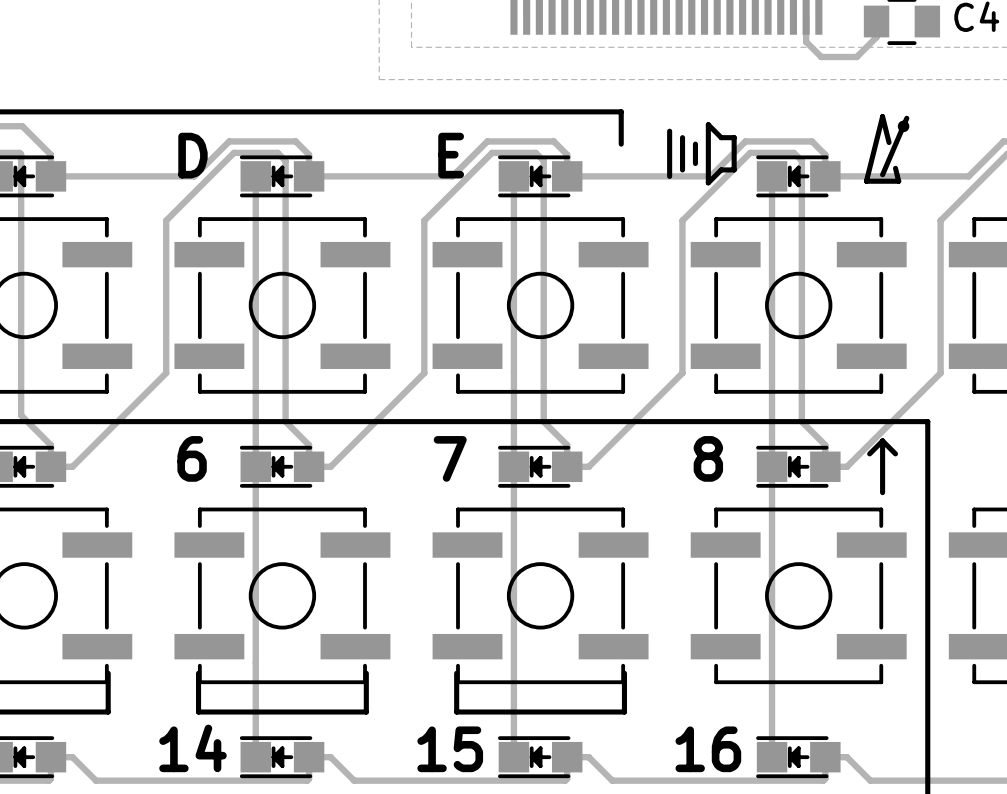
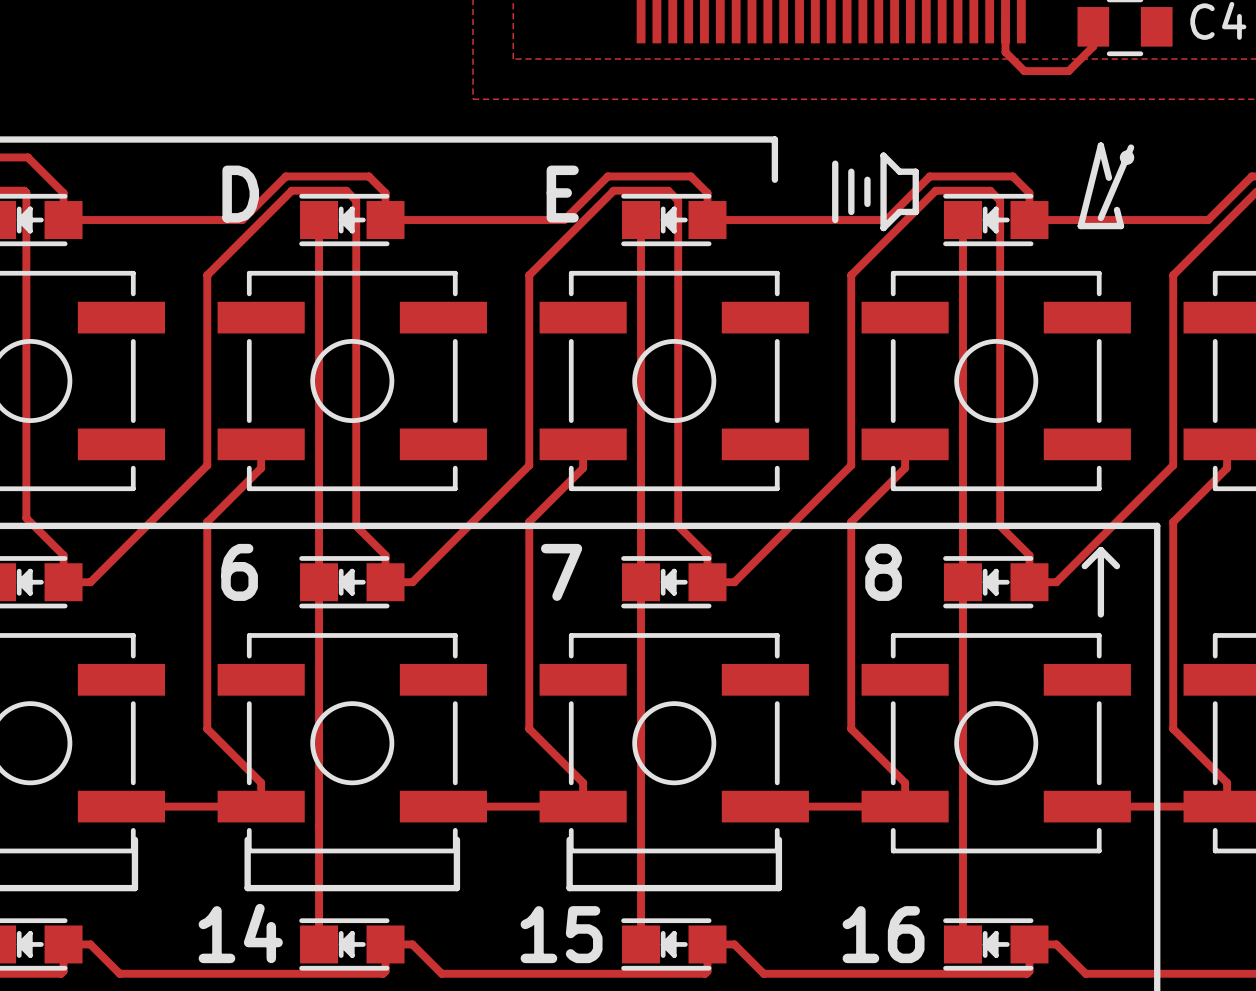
track: none -> (261, 444) (261, 468) (207, 522) (207, 728) (261, 782) (261, 806) (121, 806)
track: none -> (583, 444) (583, 468) (529, 522) (529, 728) (583, 782) (583, 806) (443, 806)
track: none -> (905, 444) (905, 468) (851, 522) (851, 728) (905, 782) (905, 806) (765, 806)
track: none -> (1227, 444) (1227, 468) (1173, 522) (1173, 728) (1227, 782) (1227, 806) (1087, 806)

